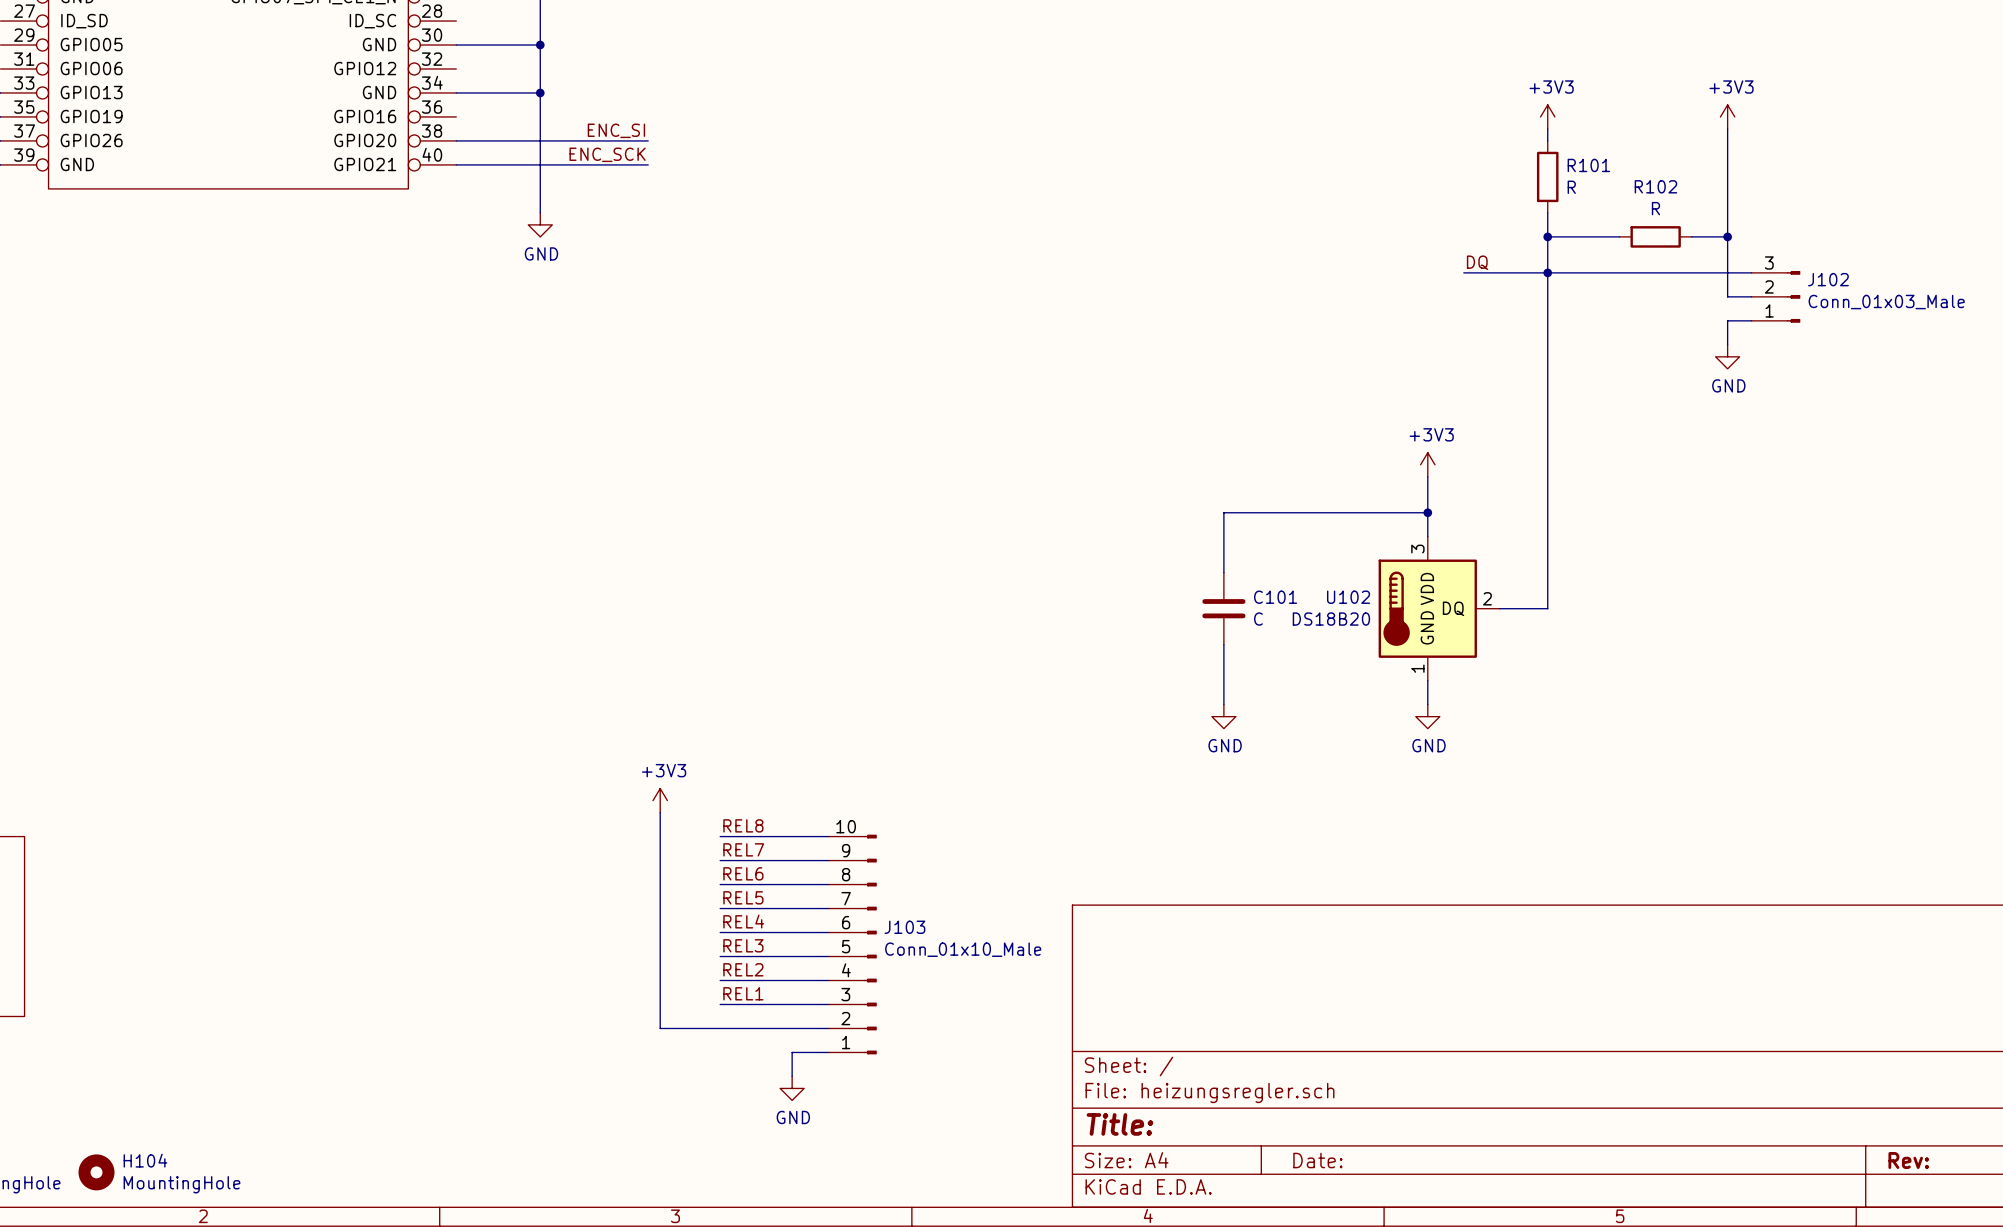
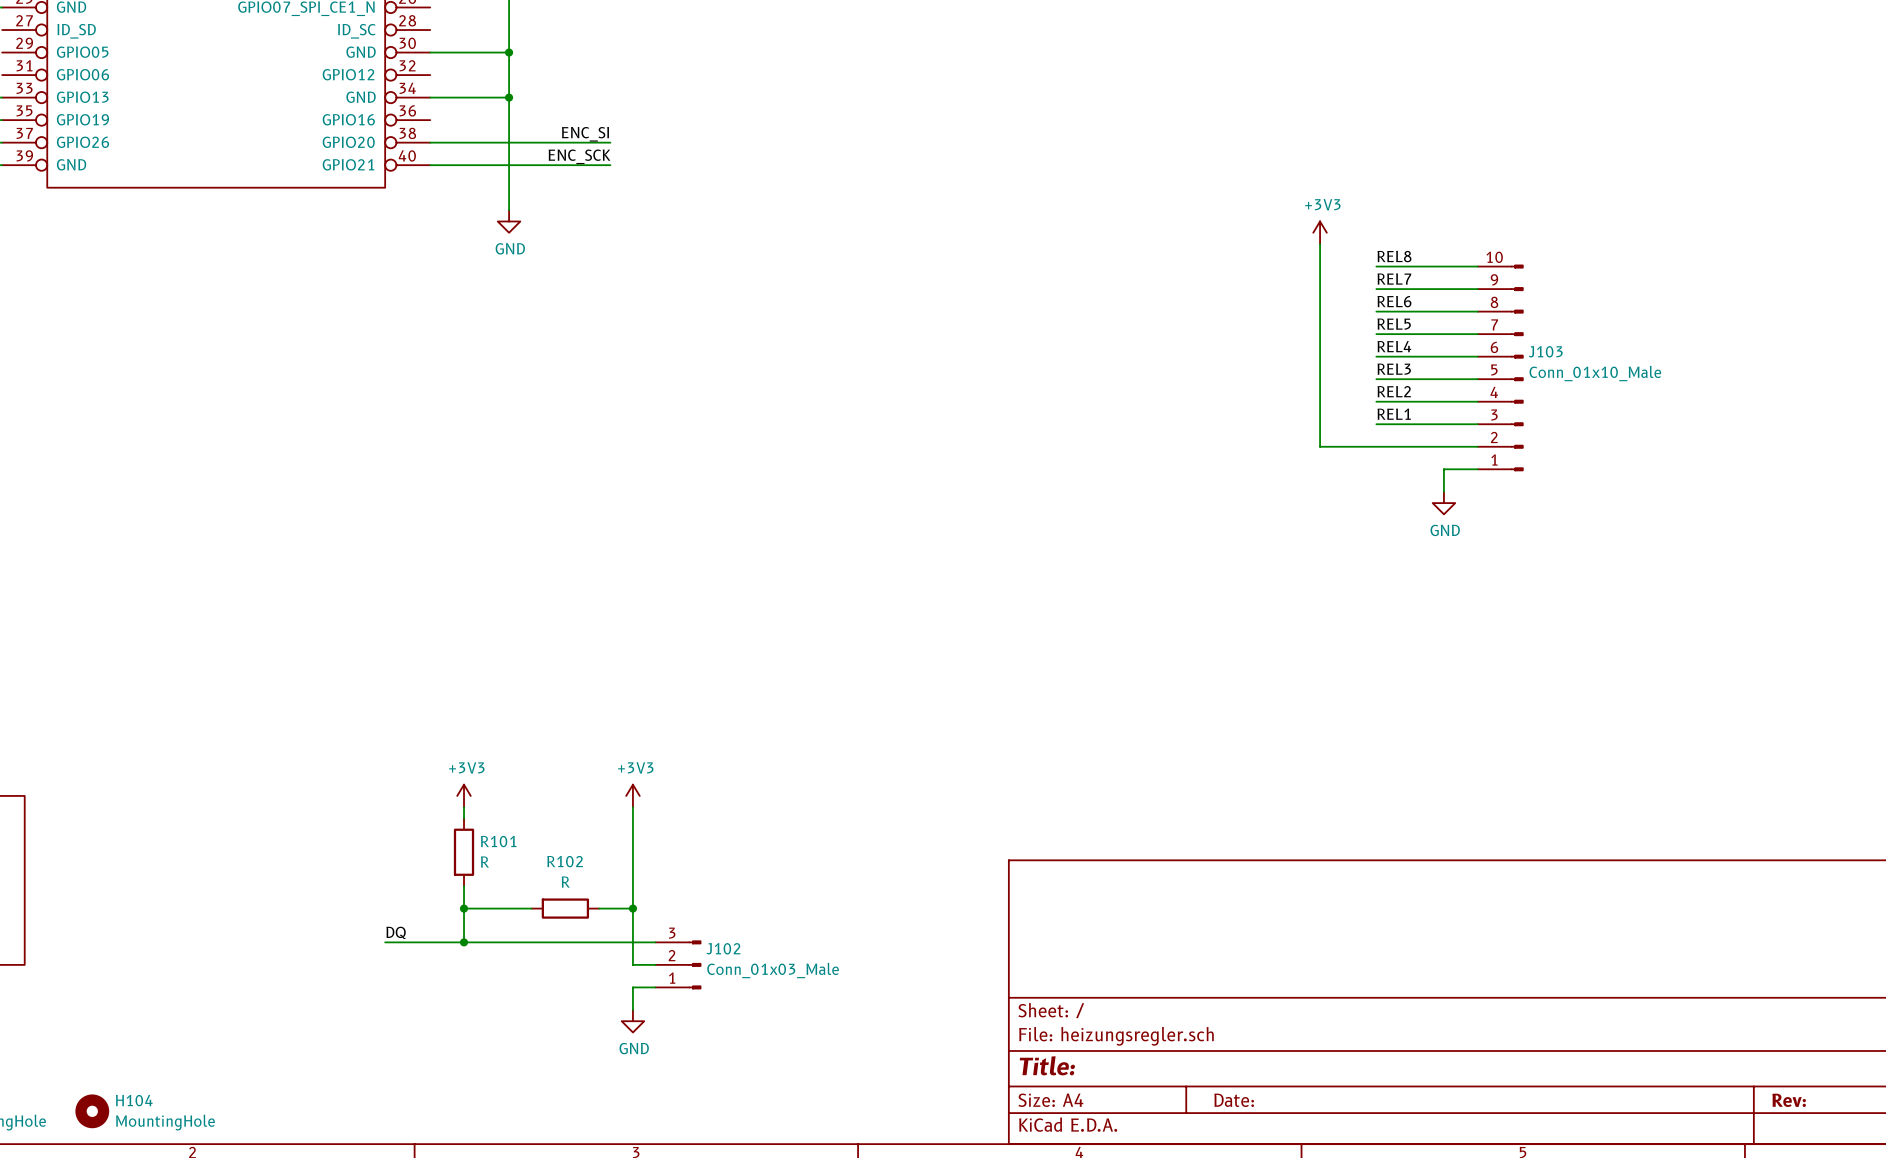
power symbol: +3V3 (1547, 116) -> none
power symbol: +3V3 (1727, 116) -> none
wire: (1547, 128) (1547, 140) -> none
wire: (1727, 128) (1727, 296) (1751, 296) -> none
R101 position: (1547, 176) -> (464, 852)
wire: (1547, 212) (1547, 608) (1499, 608) -> none
power symbol: none -> +3V3 (1320, 232)
wire: (1547, 236) (1619, 236) -> none
junction: (1547, 236) -> none
R102 position: (1655, 236) -> (565, 908)
wire: (1691, 236) (1727, 236) -> none
junction: (1727, 236) -> none
wire: none -> (1320, 244) (1320, 446) (1477, 446)
label: DQ (1477, 262) -> REL8 (1394, 256)
junction: (1547, 272) -> none
wire: (1571, 272) (1751, 272) -> none
label: none -> REL7 (1394, 279)
wire: none -> (1376, 289) (1477, 289)
J102 position: (1775, 296) -> (678, 964)
label: none -> REL6 (1394, 301)
wire: none -> (1376, 311) (1477, 311)
wire: (1751, 320) (1727, 320) (1727, 344) -> none
label: none -> REL5 (1394, 324)
wire: none -> (1376, 334) (1477, 334)
power symbol: GND (1727, 356) -> none
label: none -> REL4 (1394, 346)
wire: none -> (1376, 356) (1477, 356)
label: none -> REL3 (1394, 369)
wire: none -> (1376, 379) (1477, 379)
label: none -> REL2 (1394, 391)
wire: none -> (1376, 401) (1477, 401)
label: none -> REL1 (1394, 414)
wire: none -> (1376, 424) (1477, 424)
power symbol: +3V3 (1427, 464) -> none
wire: (1427, 476) (1427, 536) -> none
wire: none -> (1477, 469) (1443, 469) (1443, 491)
wire: (1427, 512) (1223, 512) (1223, 572) -> none
junction: (1427, 512) -> none
power symbol: none -> GND (1443, 503)
C101: C (1223, 608) -> none
U102: DS18B20 (1439, 608) -> none
wire: (1223, 644) (1223, 704) -> none
wire: (1427, 680) (1427, 704) -> none
power symbol: GND (1223, 716) -> none
power symbol: GND (1427, 716) -> none
power symbol position: +3V3 (660, 800) -> +3V3 (632, 795)
wire: (660, 812) (660, 1028) (828, 1028) -> none
label: REL8 (743, 825) -> none
power symbol: none -> +3V3 (464, 795)
wire: (720, 836) (828, 836) -> none
wire: none -> (464, 807) (464, 818)
wire: none -> (632, 807) (632, 964) (655, 964)
label: REL7 (743, 849) -> none
wire: (720, 860) (828, 860) -> none
label: REL6 (743, 873) -> none
wire: (720, 884) (828, 884) -> none
label: REL5 (743, 897) -> none
wire: (720, 908) (828, 908) -> none
label: REL4 (743, 921) -> none
wire: none -> (464, 886) (464, 942)
wire: (720, 932) (828, 932) -> none
J103 position: (852, 944) -> (1500, 367)
label: REL3 (743, 945) -> none
wire: none -> (464, 908) (531, 908)
junction: none -> (464, 908)
wire: none -> (599, 908) (632, 908)
junction: none -> (632, 908)
wire: (720, 956) (828, 956) -> none
label: REL2 (743, 969) -> none
wire: (720, 980) (828, 980) -> none
label: none -> DQ (396, 932)
wire: none -> (385, 942) (655, 942)
junction: none -> (464, 942)
label: REL1 (743, 993) -> none
wire: (720, 1004) (828, 1004) -> none
wire: none -> (655, 987) (632, 987) (632, 1009)
wire: (828, 1052) (792, 1052) (792, 1076) -> none
power symbol position: GND (792, 1088) -> GND (632, 1021)

